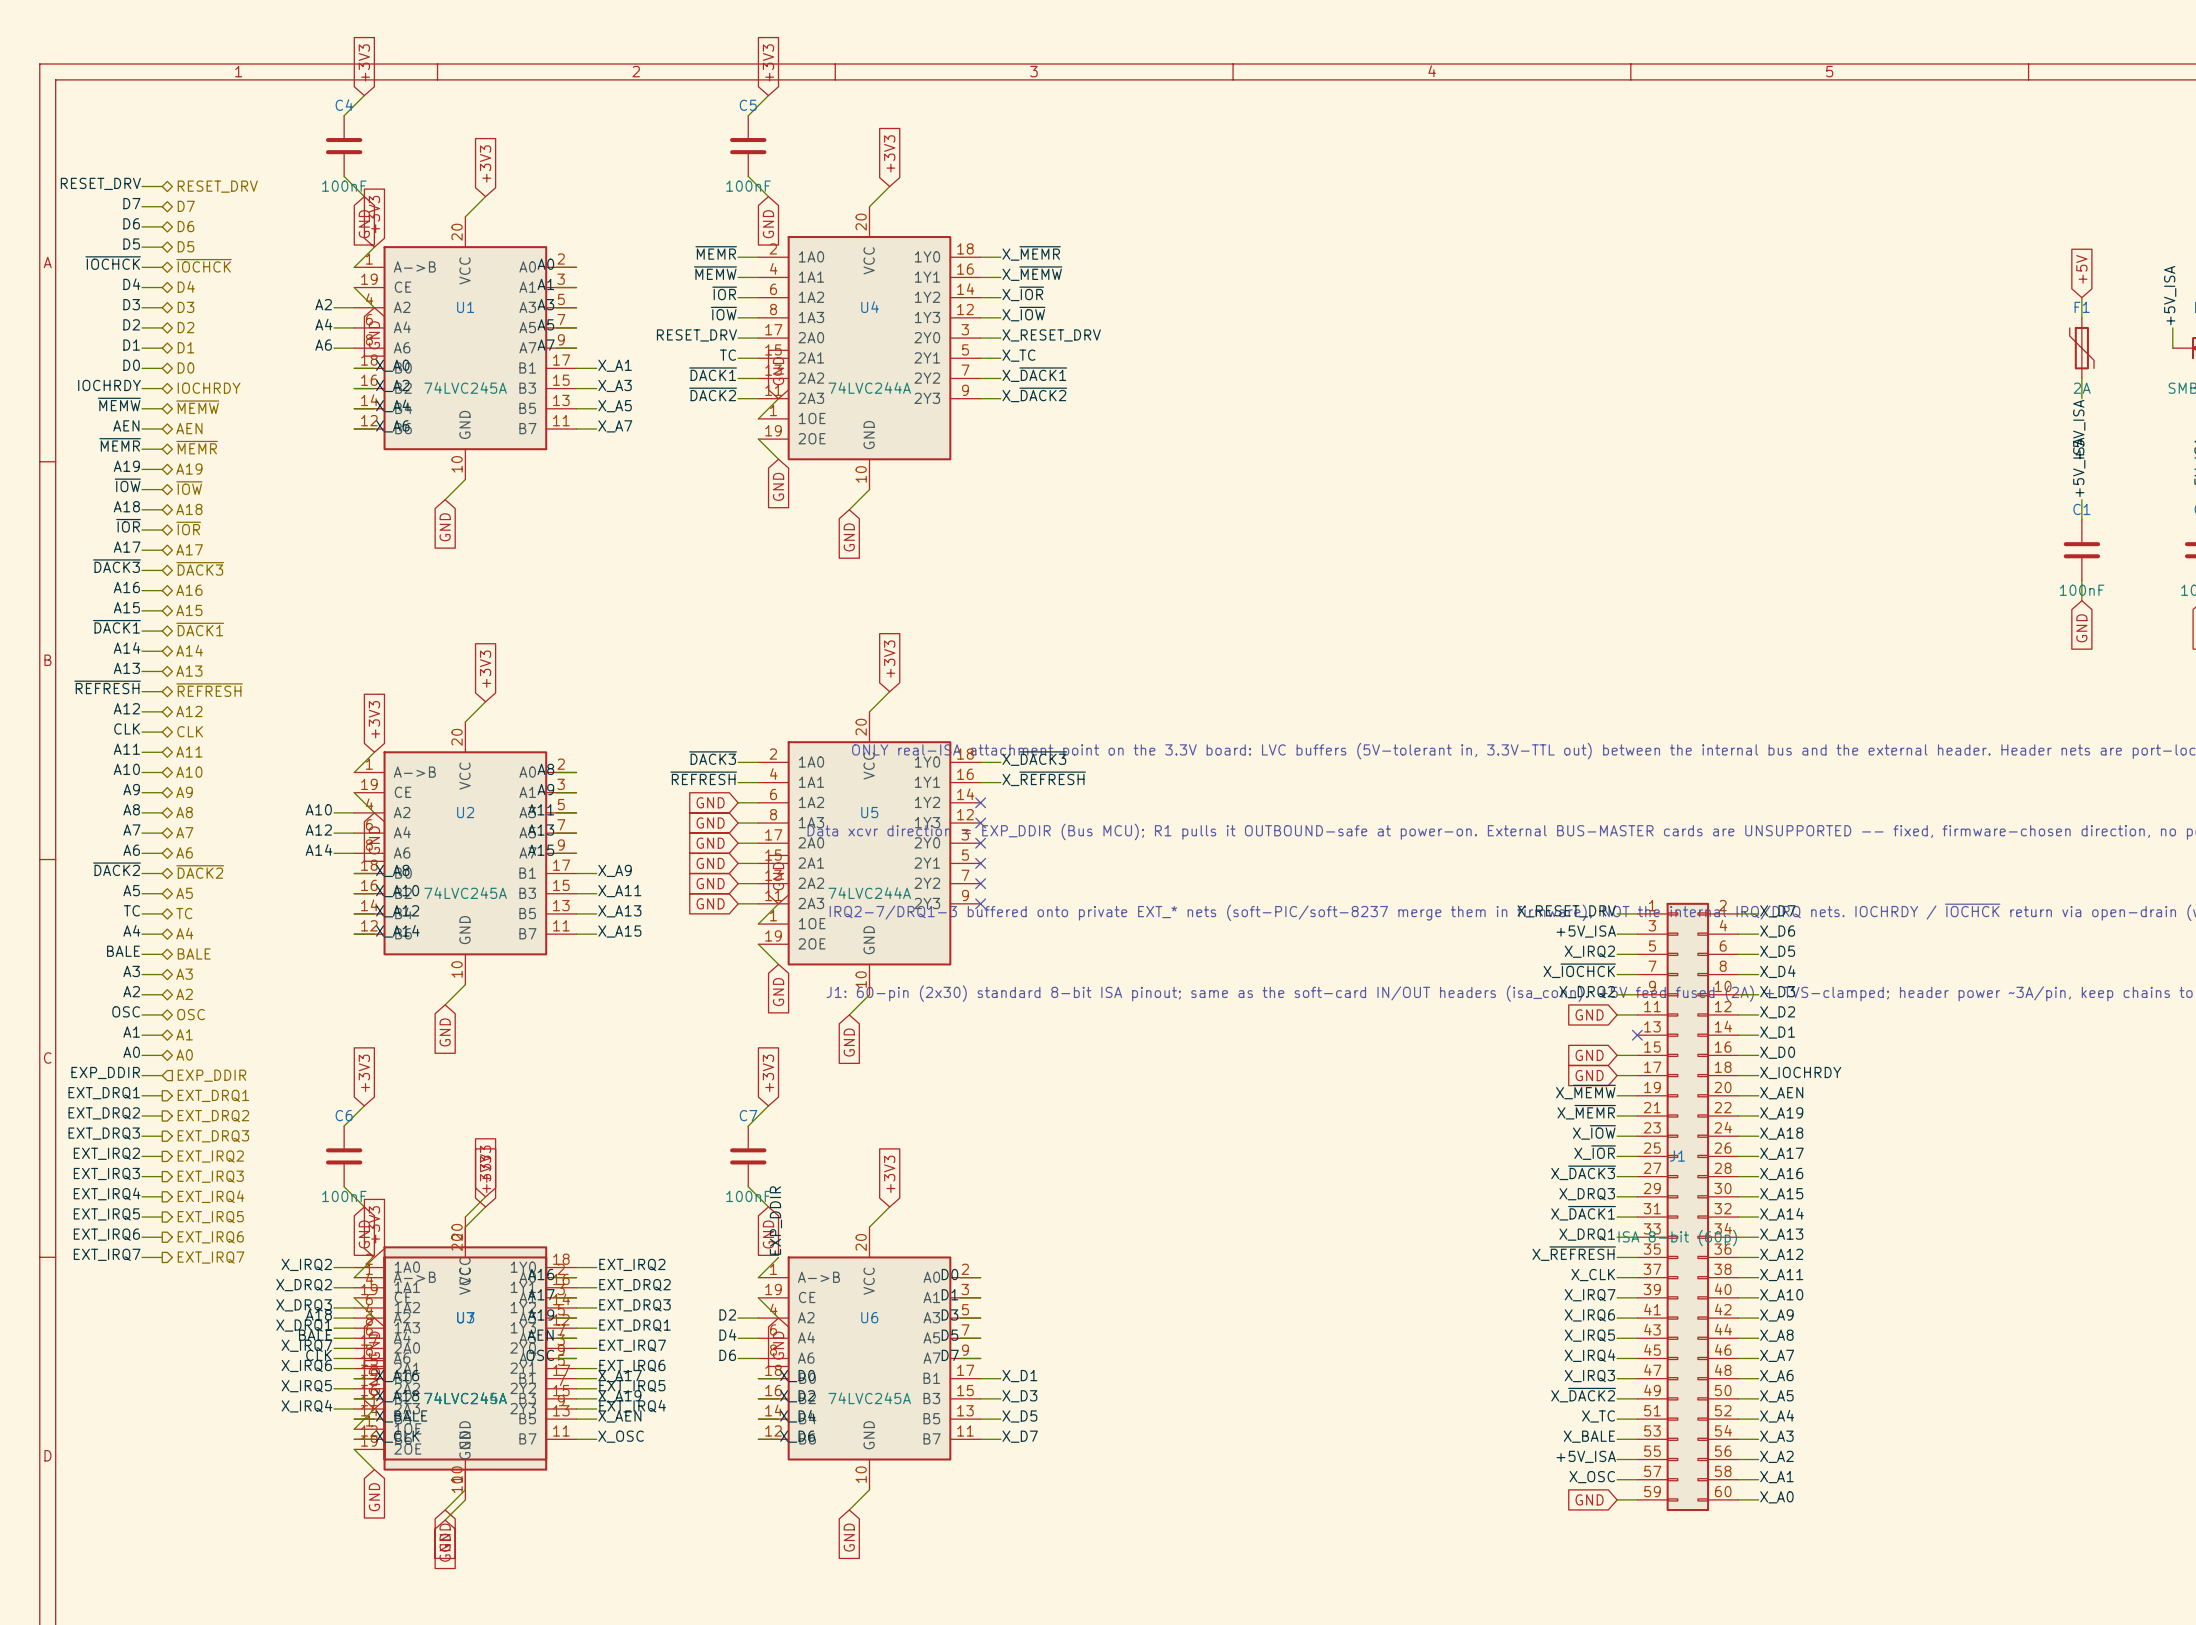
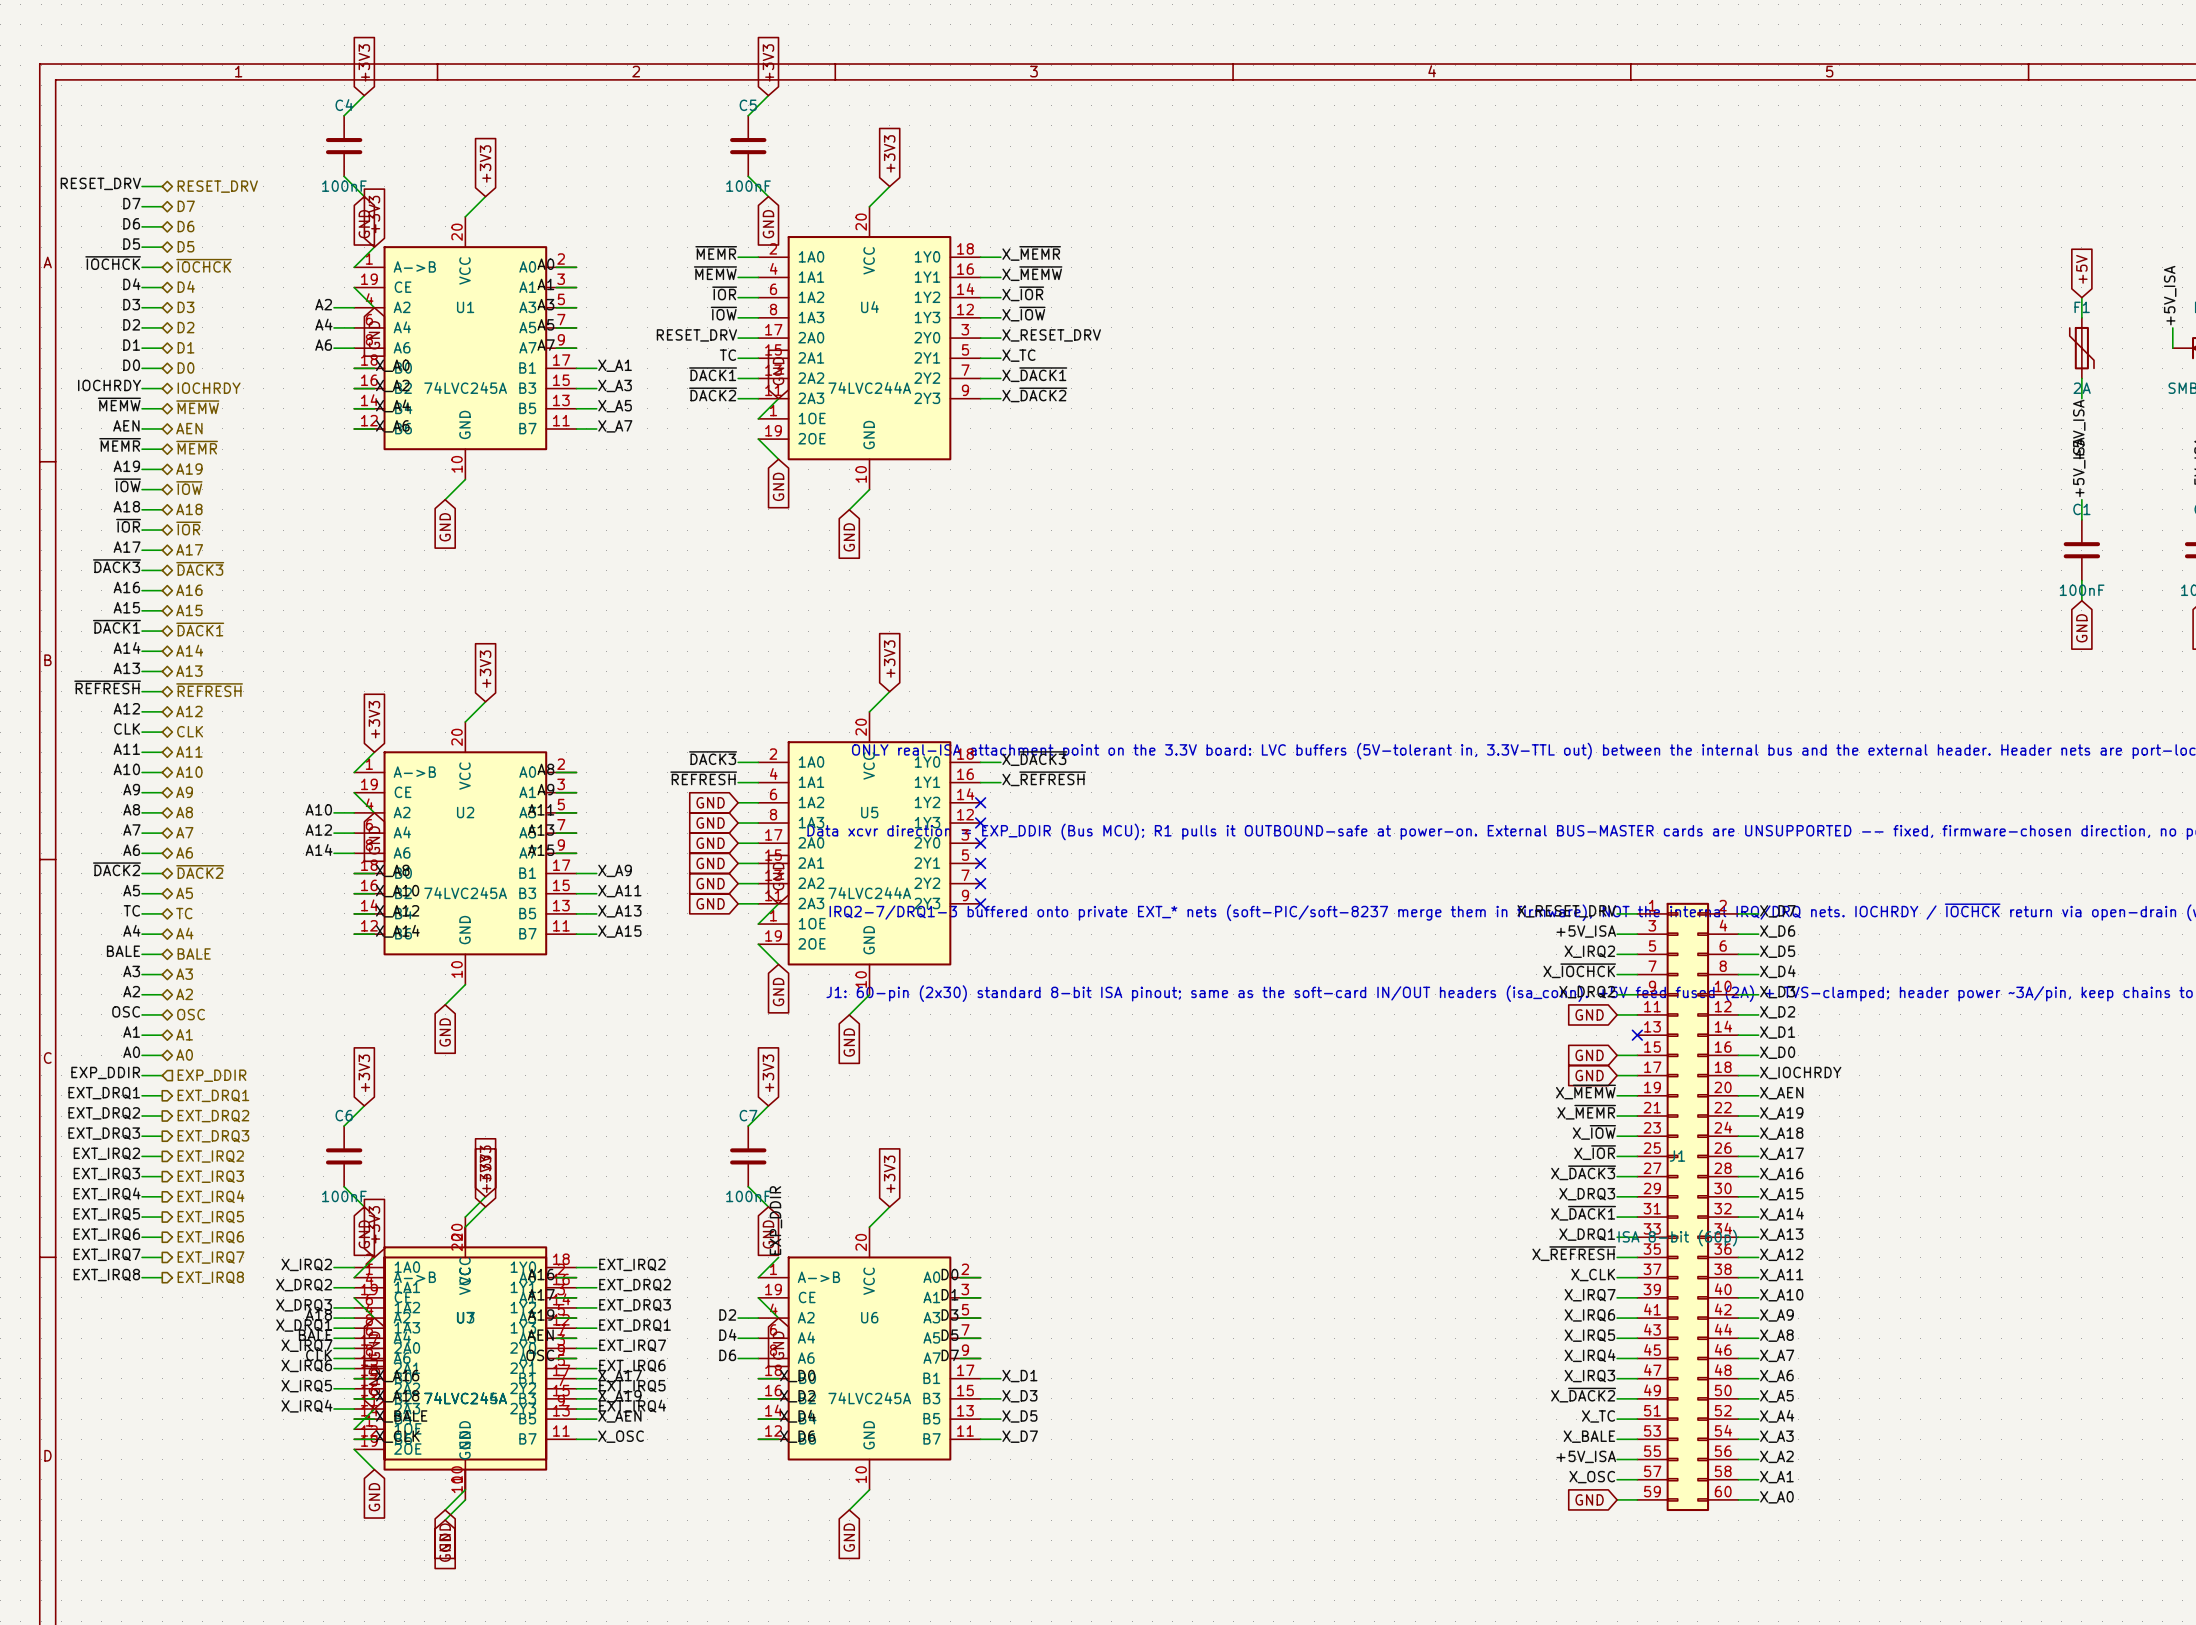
label: none -> EXT_IRQ8 (106, 1275)
wire: none -> (142, 1277) (162, 1277)
hierarchical label: none -> EXT_IRQ8 (210, 1277)

